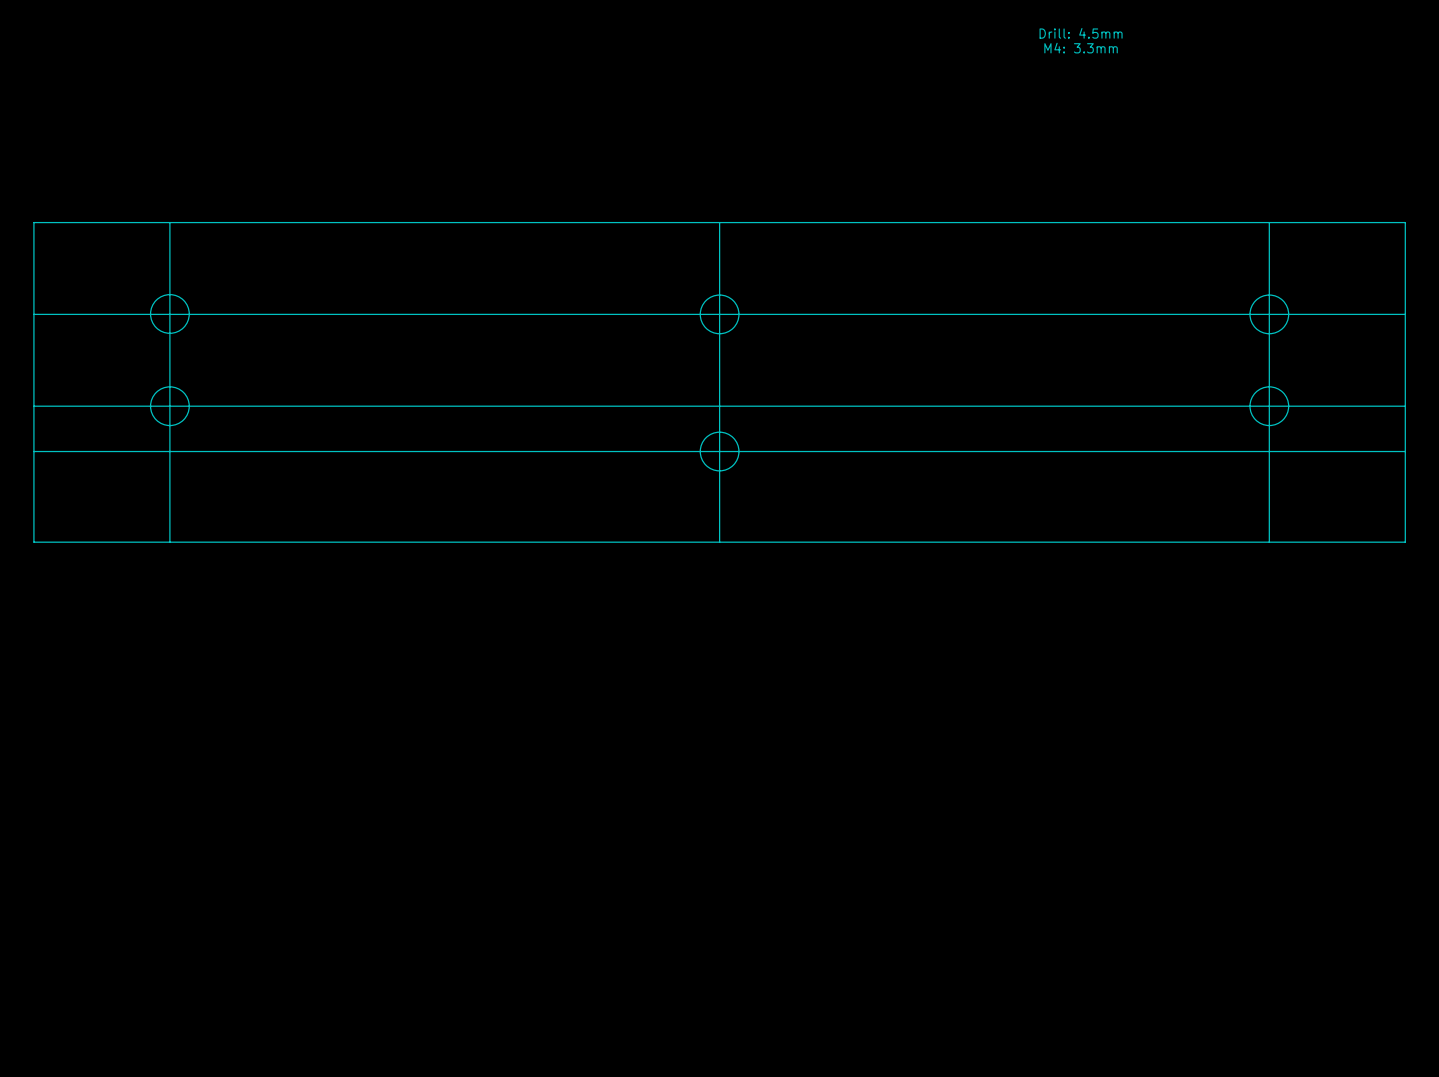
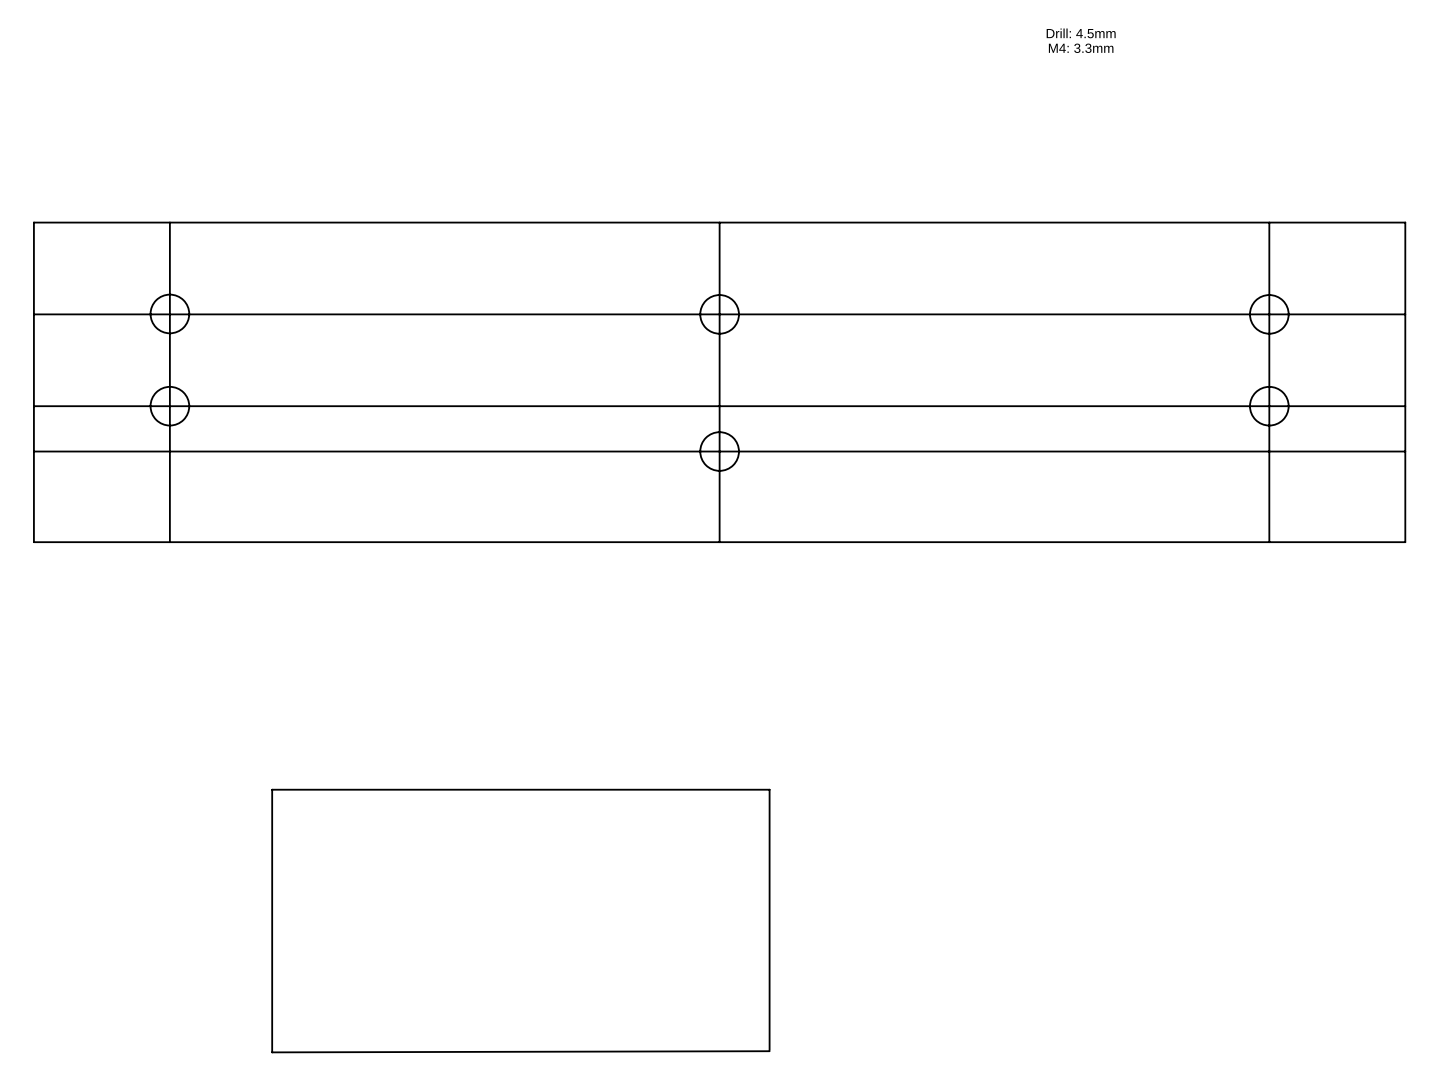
line: none -> (769, 1050) (769, 789) (272, 789) (272, 1052) (769, 1051)

